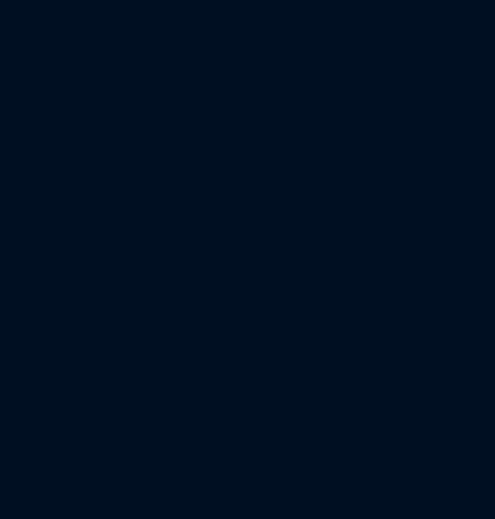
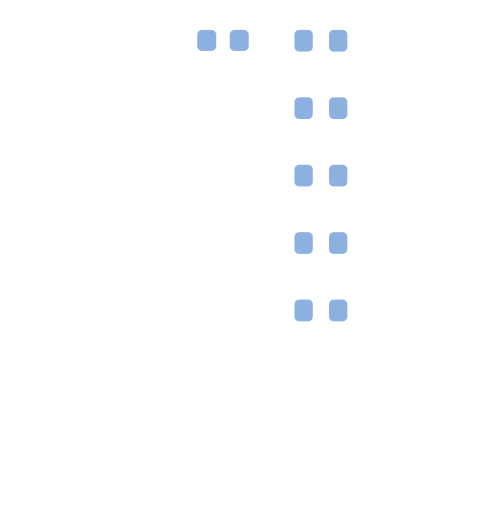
part: none -> (222, 40)
part: none -> (320, 40)
part: none -> (320, 108)
part: none -> (320, 175)
part: none -> (320, 243)
part: none -> (320, 310)

